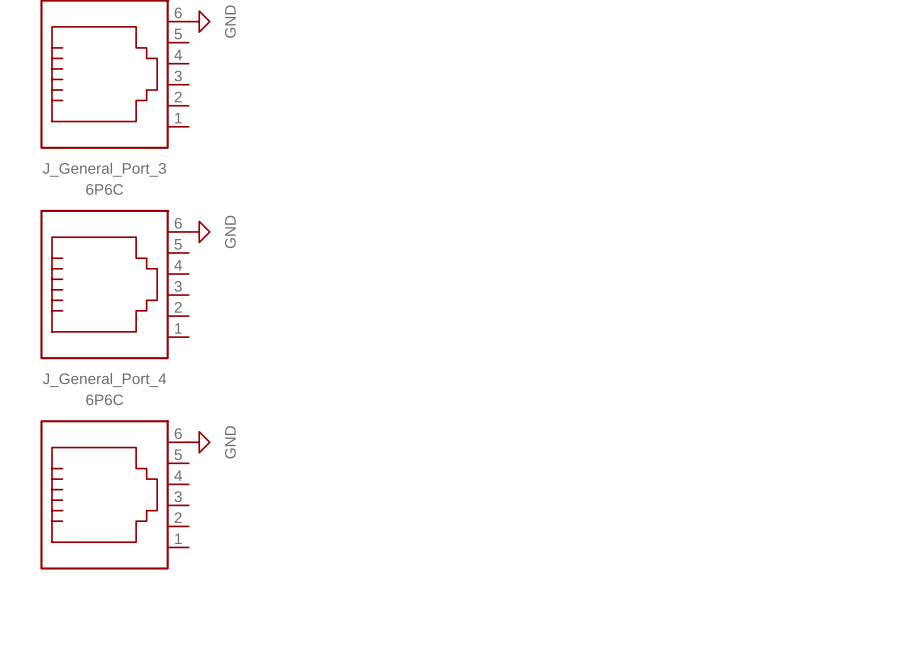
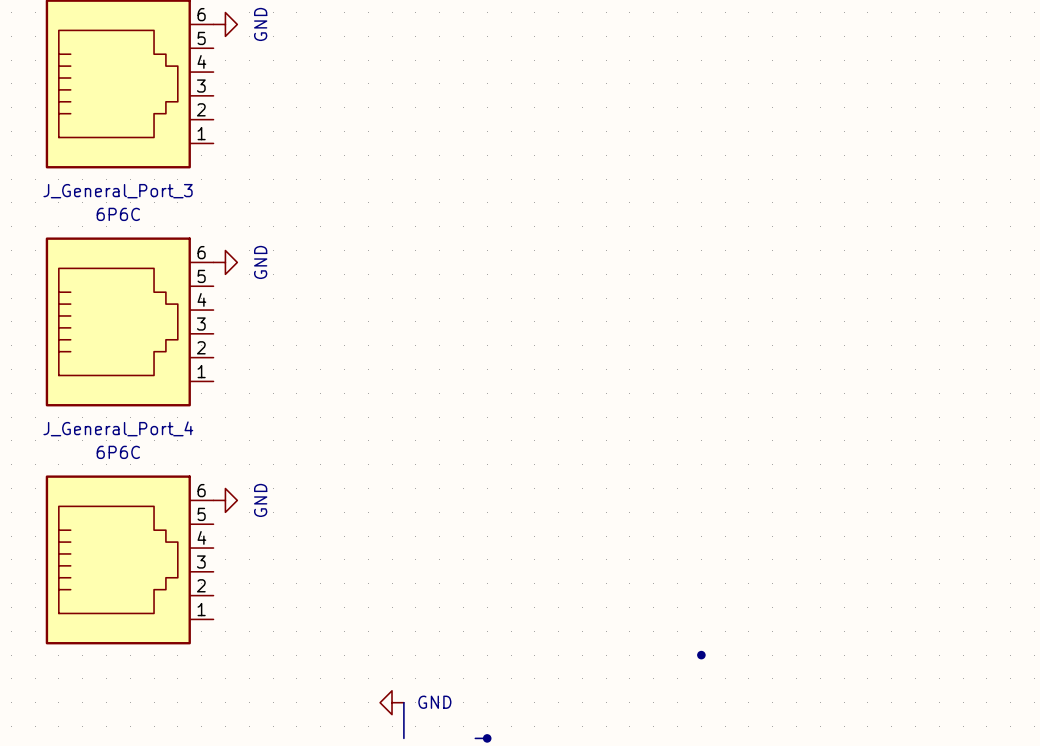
junction: none -> (701, 655)
power symbol: none -> GND (392, 702)
wire: none -> (403, 702) (403, 738)
wire: none -> (475, 738) (487, 738)
junction: none -> (487, 738)

